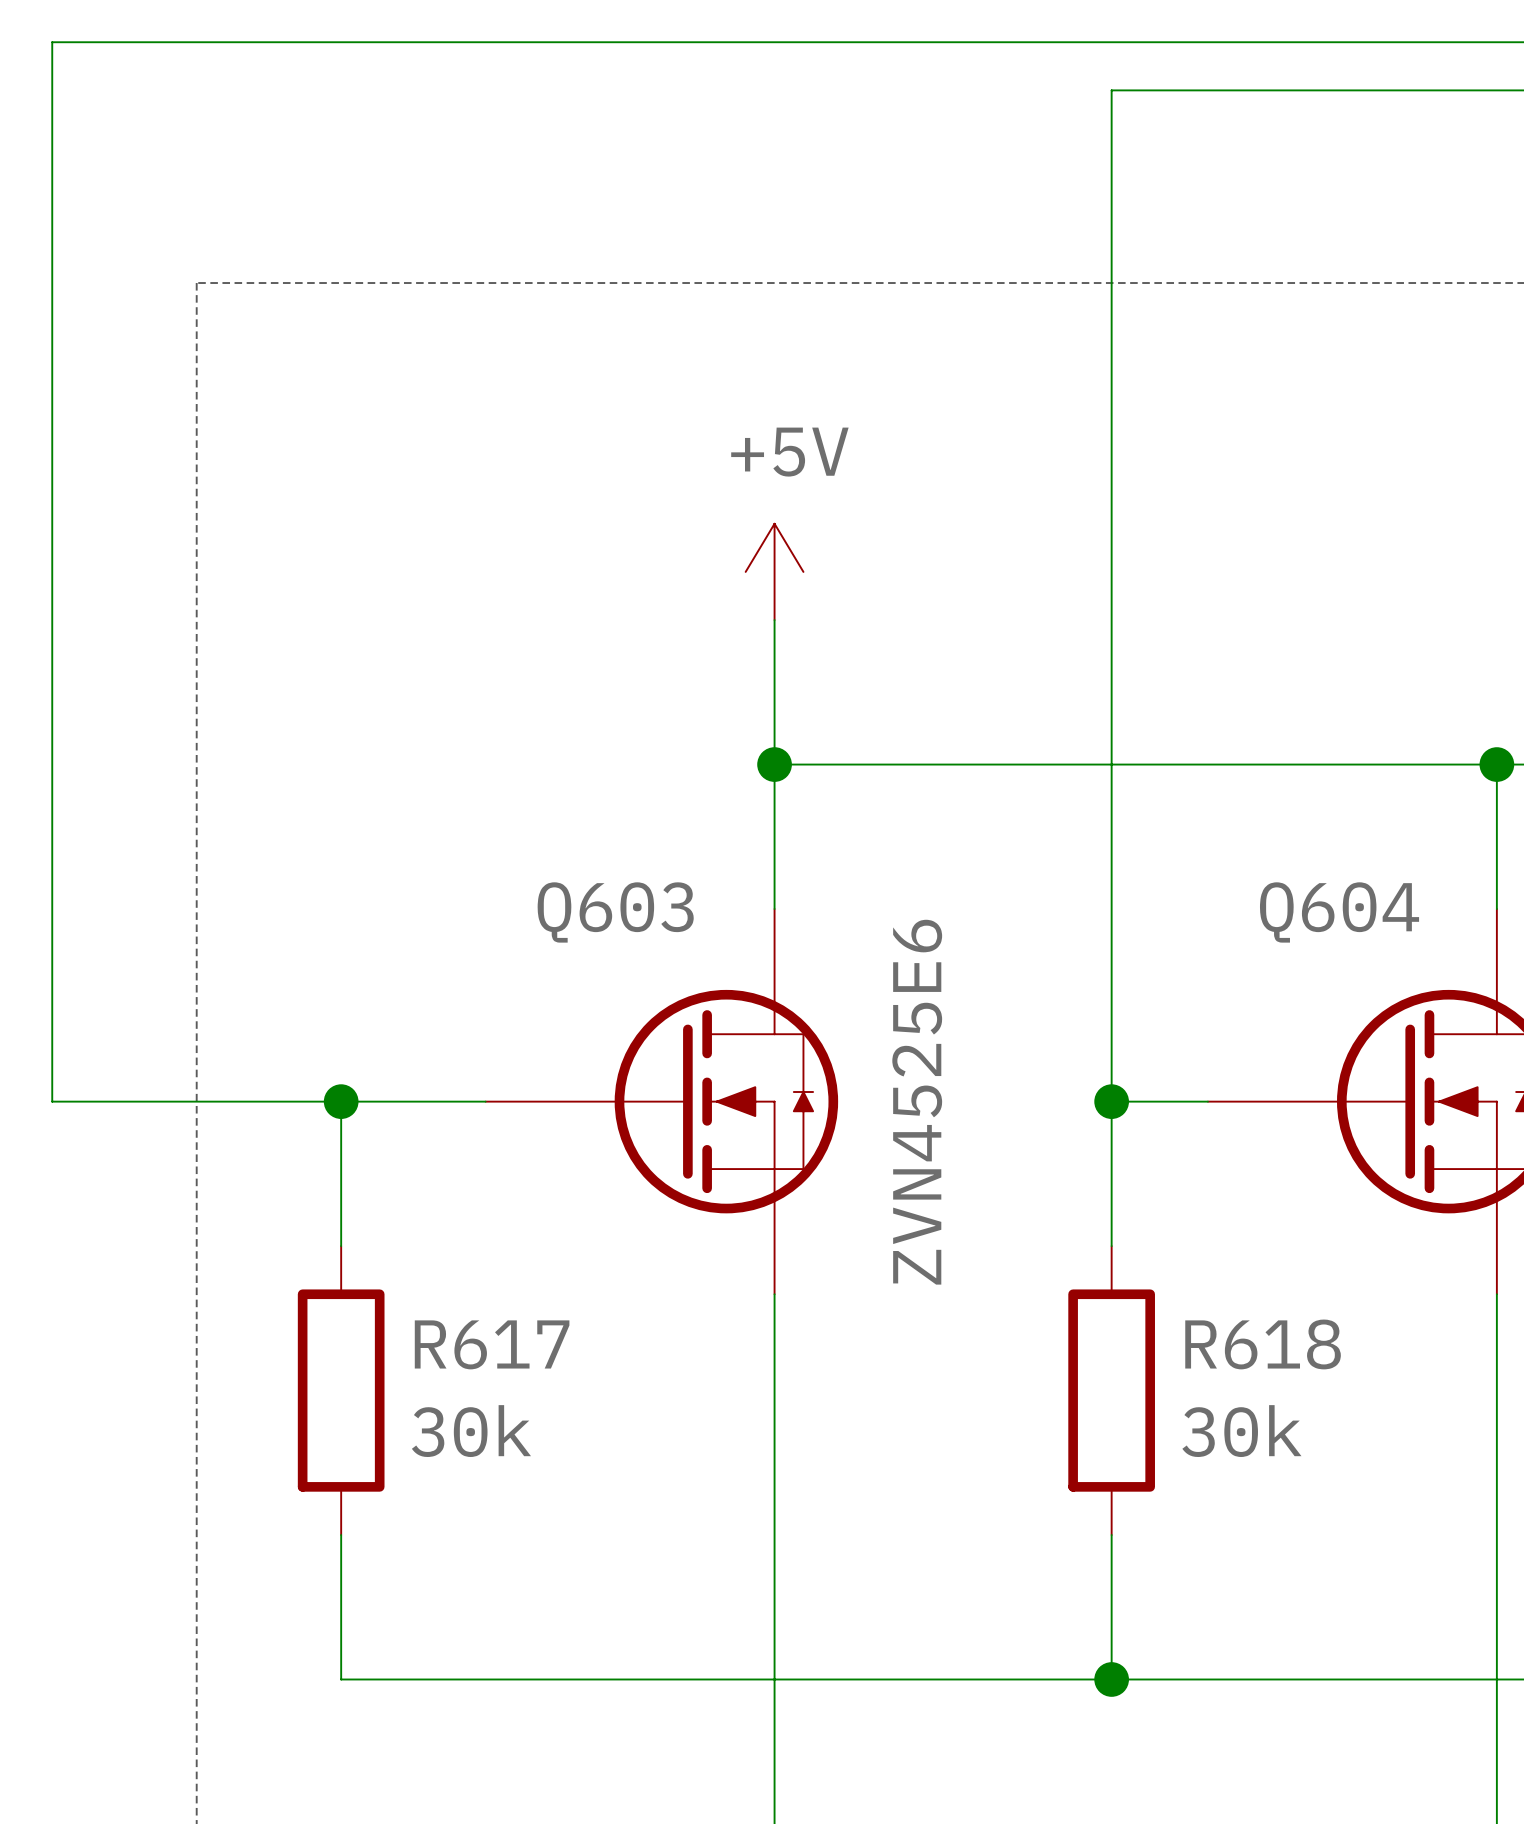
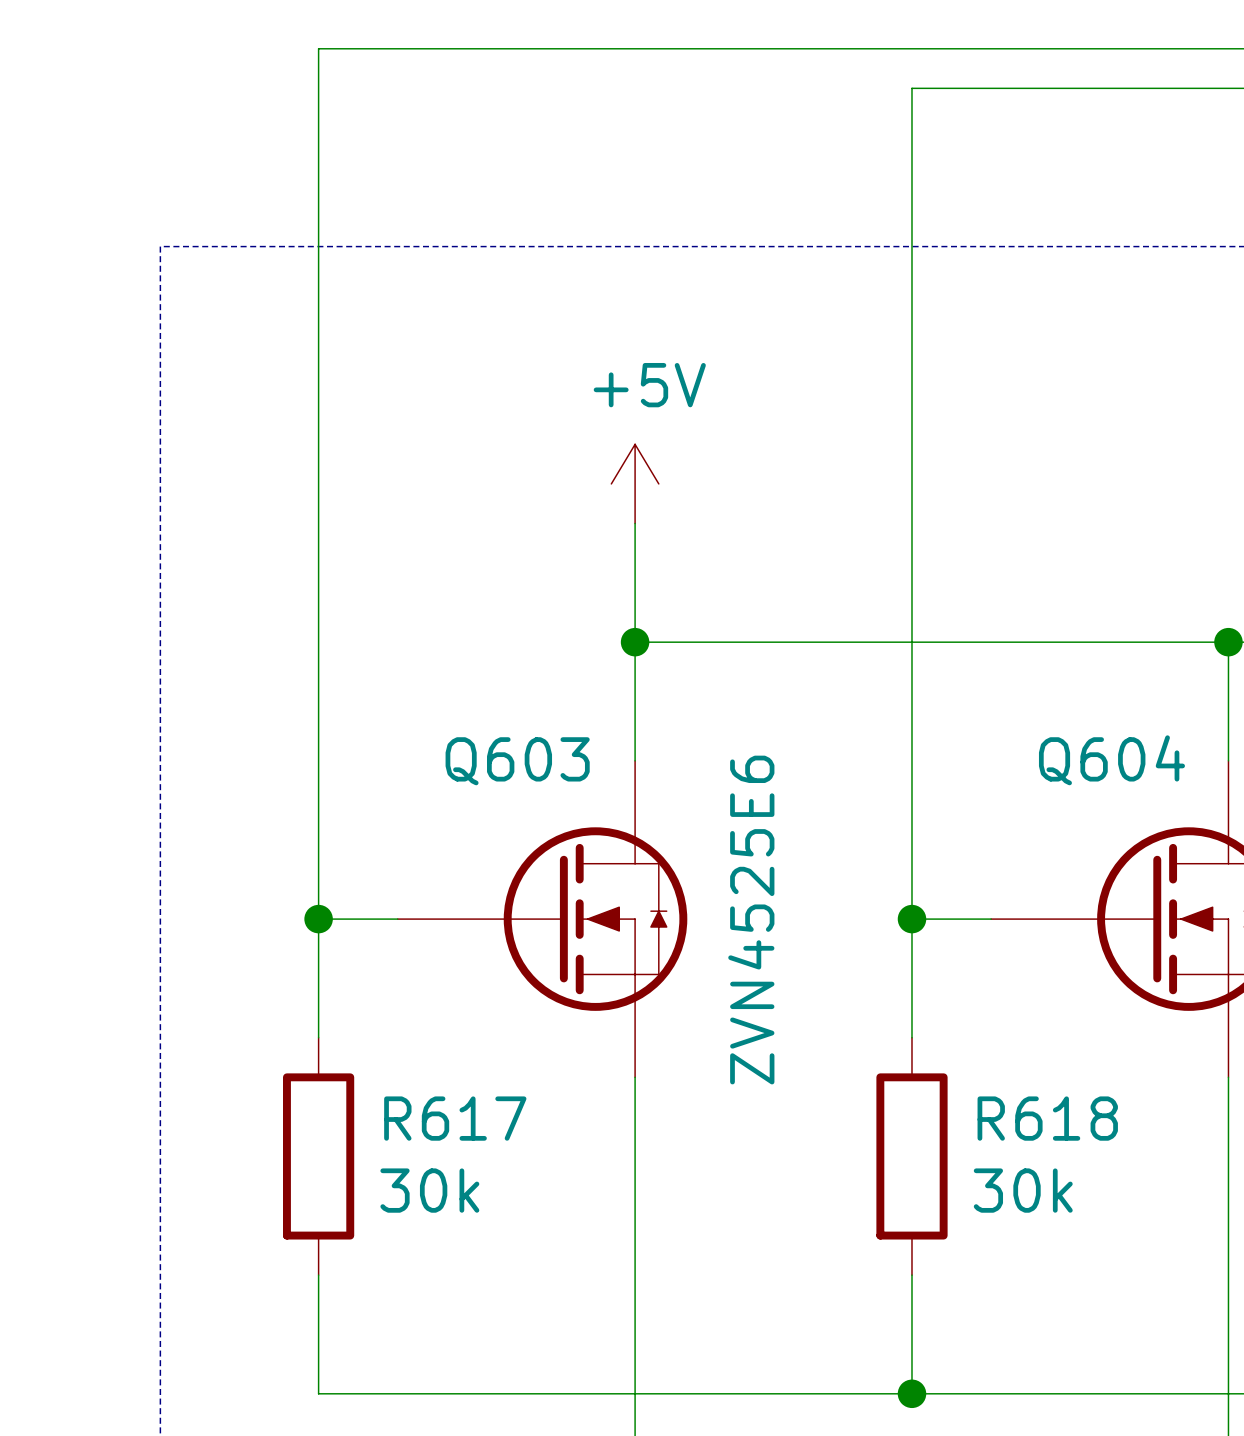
wire: (389, 42) (52, 42) (52, 1101) (389, 1101) -> (318, 48) (318, 1037)
wire: (341, 1101) (341, 1246) -> none
junction position: (341, 1101) -> (318, 919)
R617 position: (341, 1390) -> (318, 1156)
wire: (341, 1535) (341, 1679) (389, 1679) -> (318, 1275) (318, 1393)

